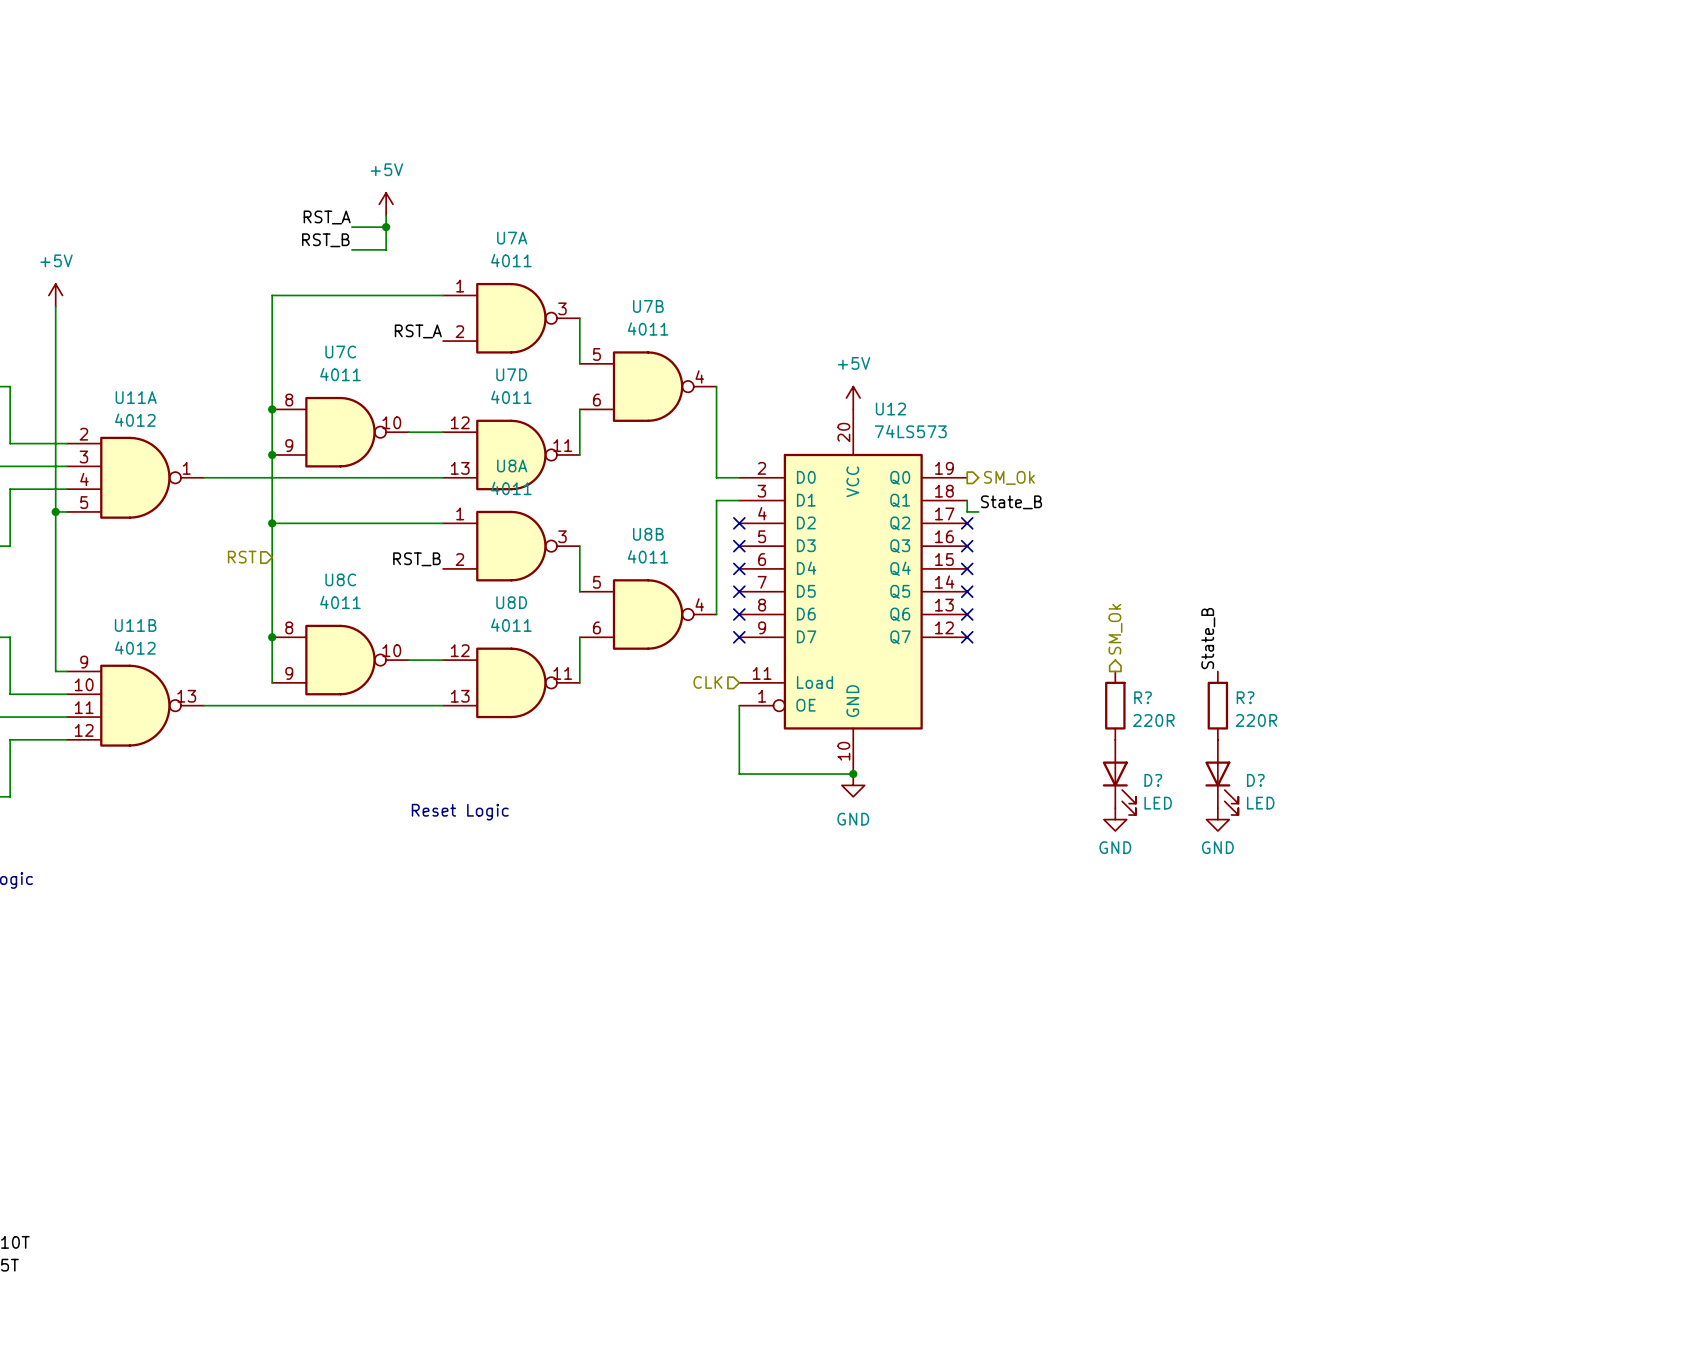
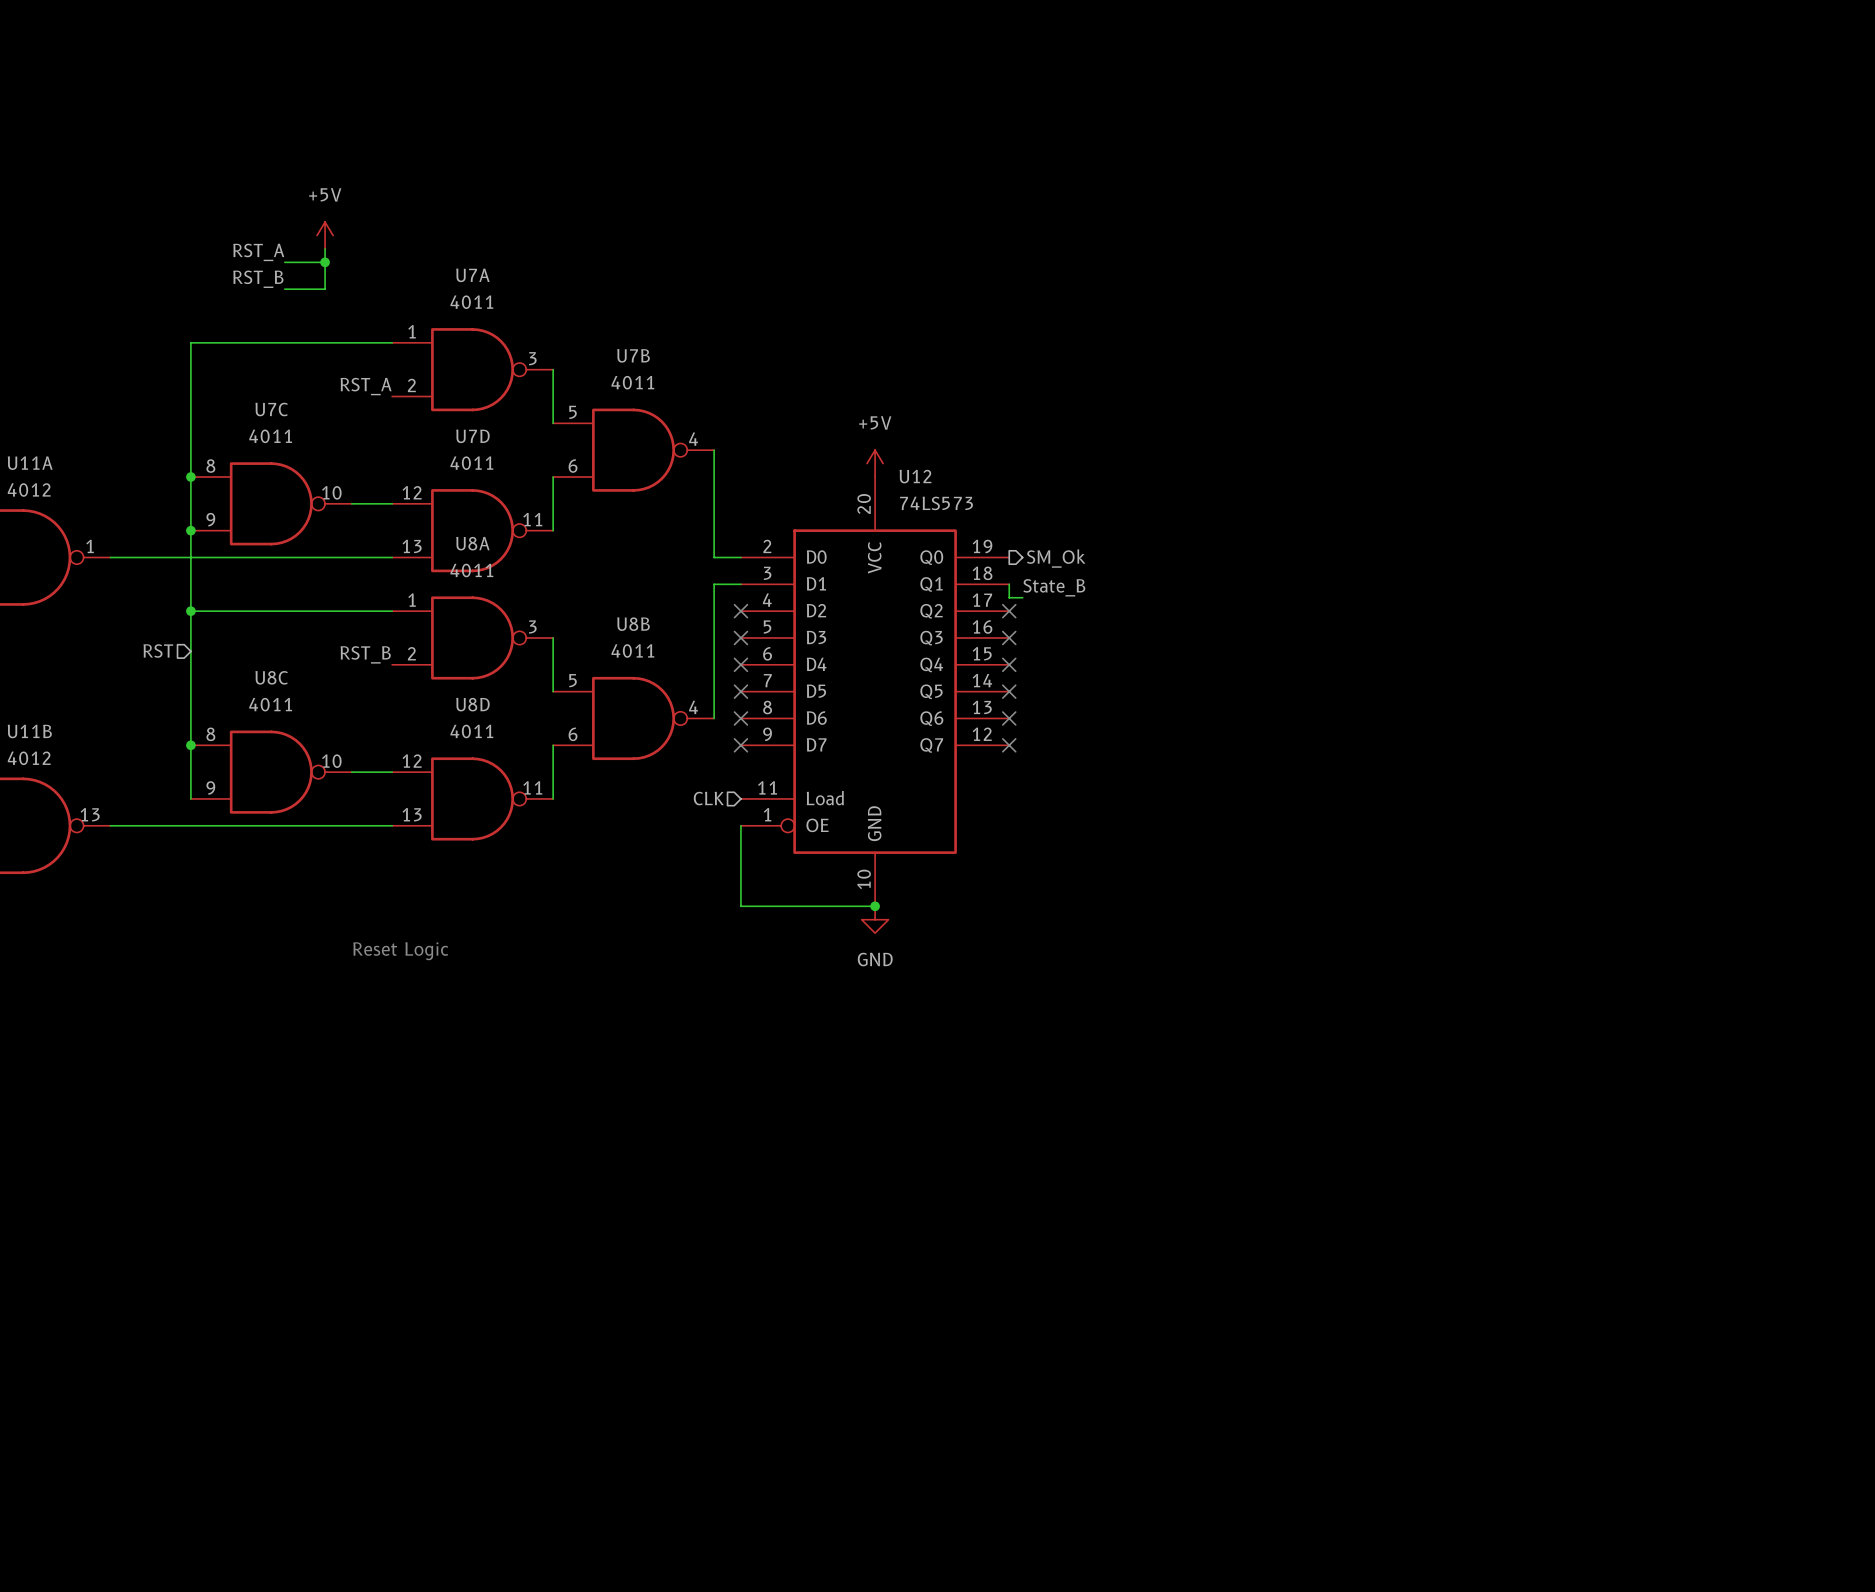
hierarchical label: SM_Ok (1115, 629) -> none
label: State_B (1208, 638) -> none
R?: 220R (1115, 705) -> none
R?: 220R (1217, 705) -> none
D?: LED (1119, 777) -> none
D?: LED (1221, 777) -> none
power symbol: GND (1115, 819) -> none
power symbol: GND (1217, 819) -> none

